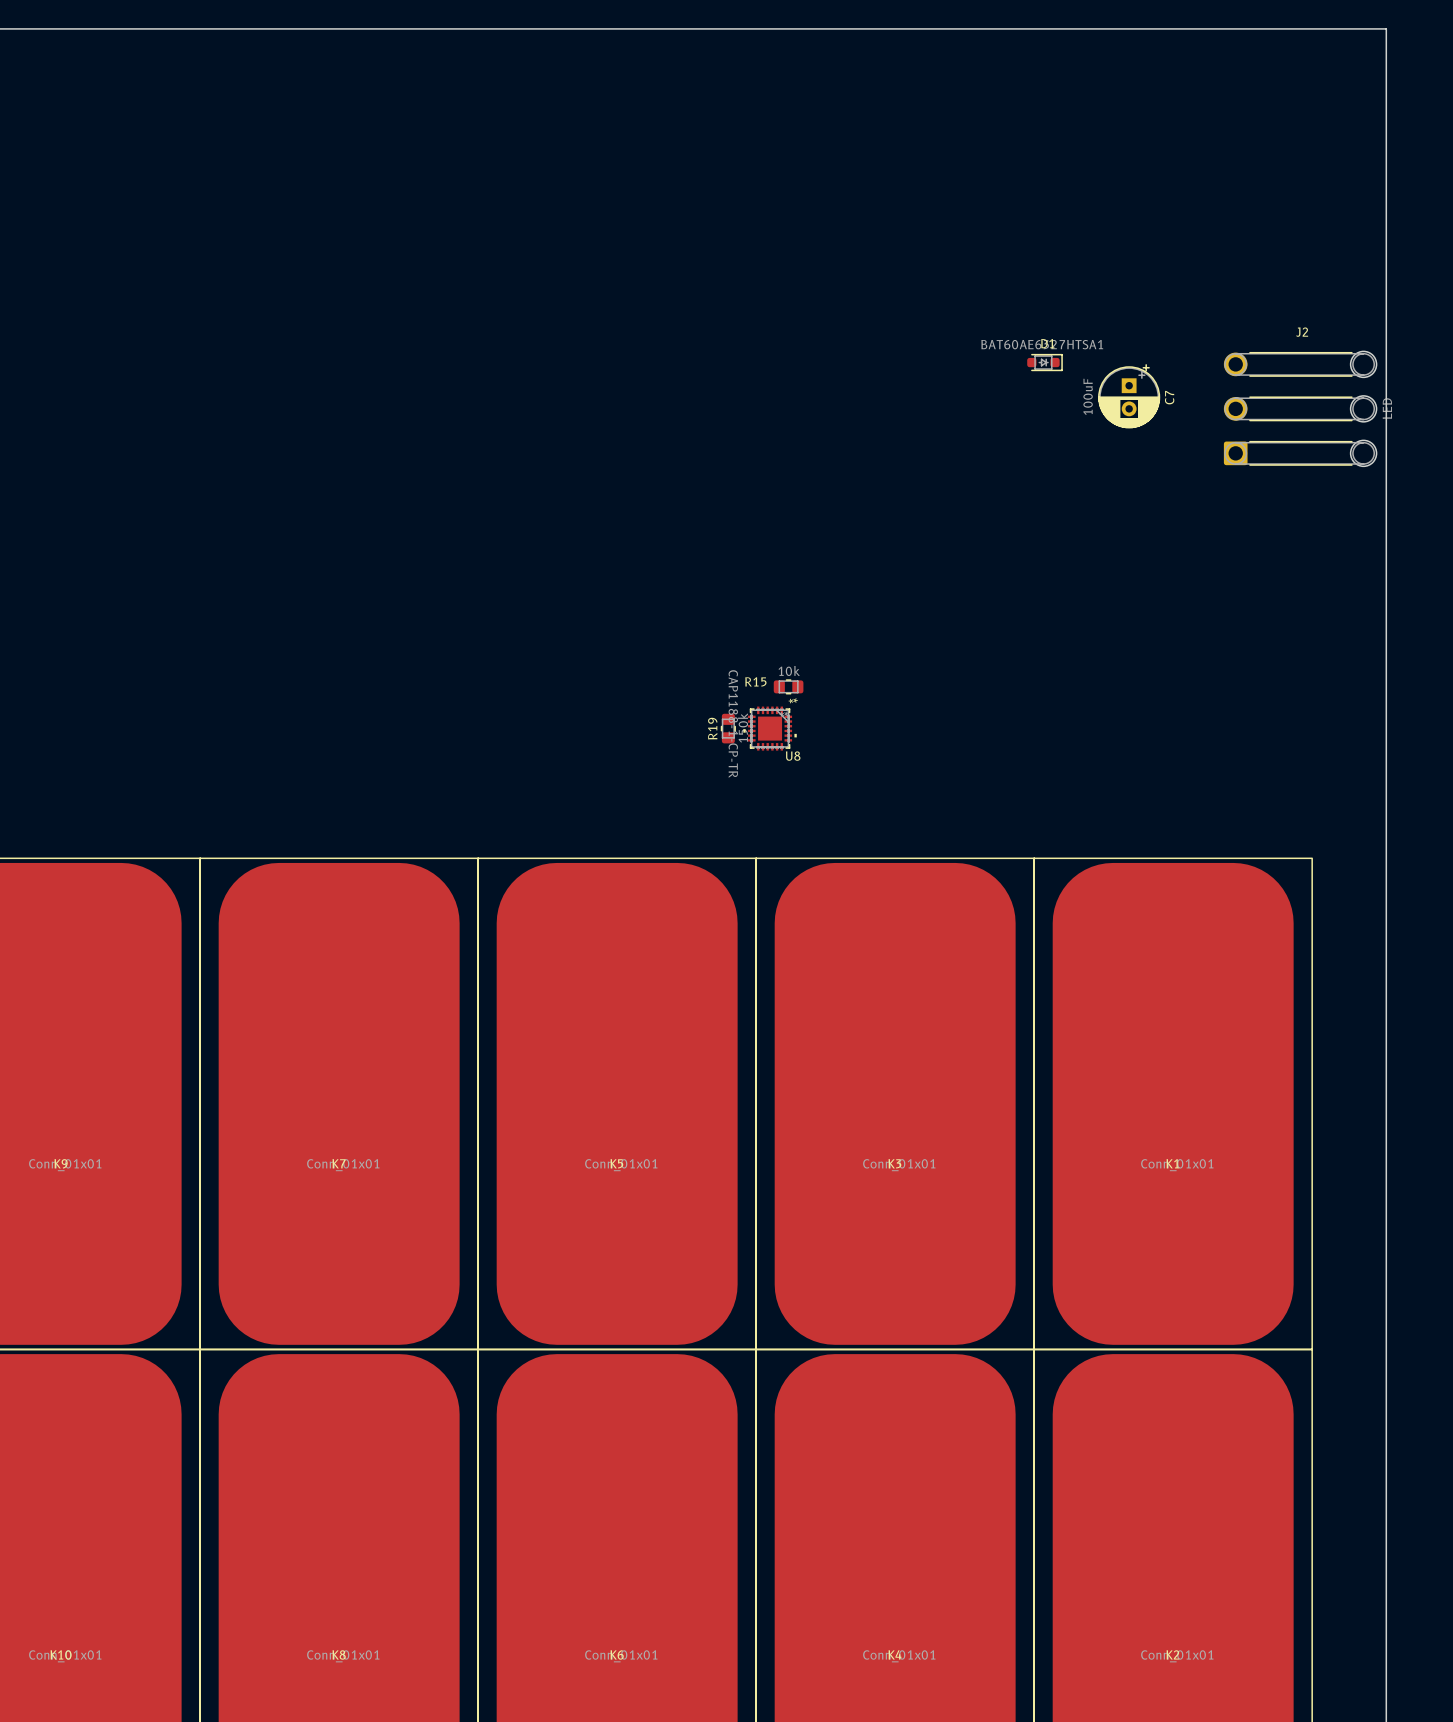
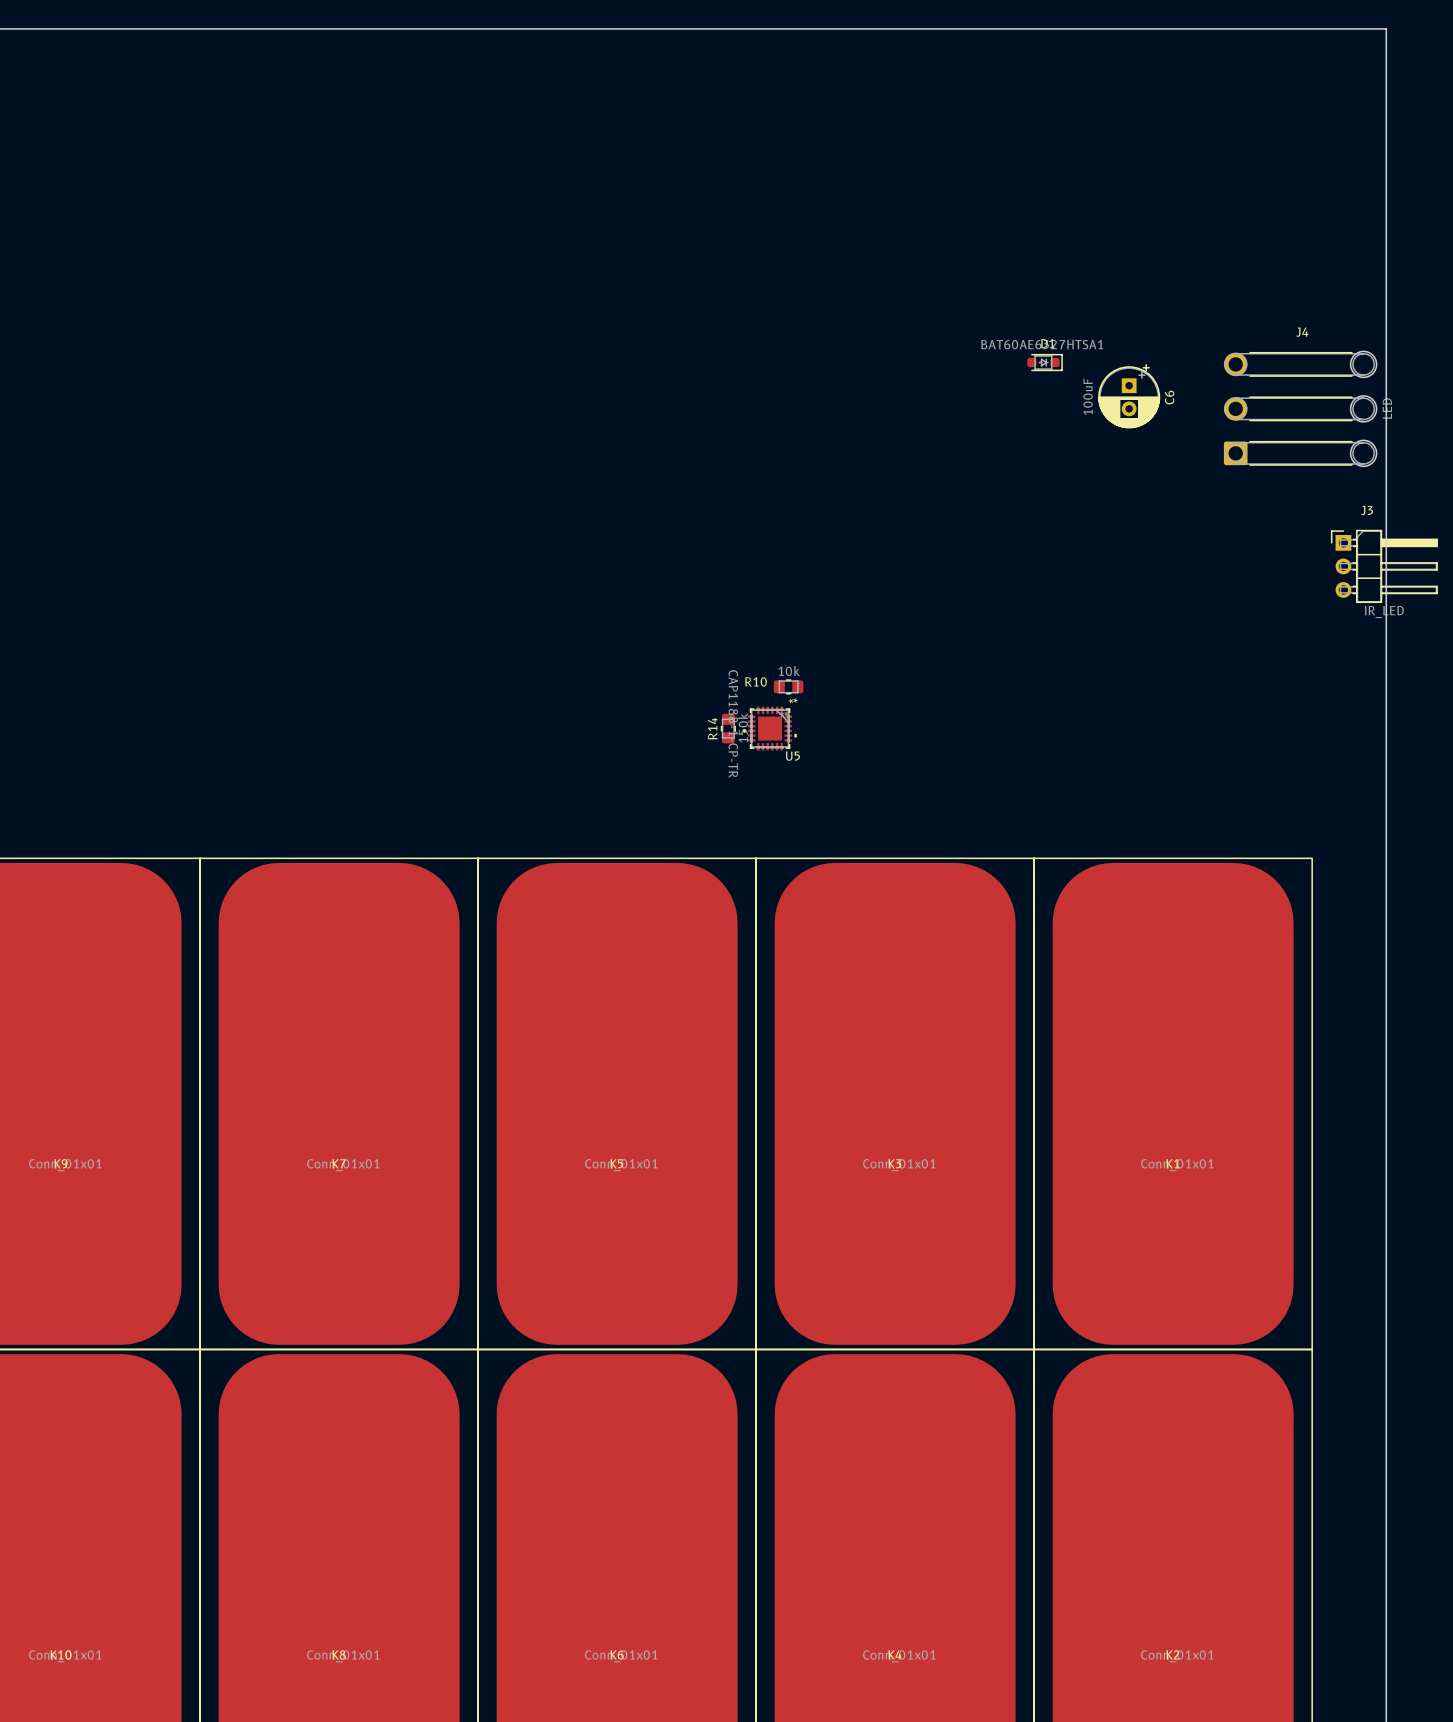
J2 name: J2 (1302, 332) -> J4 (1302, 332)
C7 name: C7 (1169, 397) -> C6 (1169, 397)
J3: none -> IR_LED (1384, 566)
R15 name: R15 (755, 681) -> R10 (756, 681)
R19 name: R19 (712, 728) -> R14 (712, 728)
U8 name: U8 (793, 756) -> U5 (792, 756)

